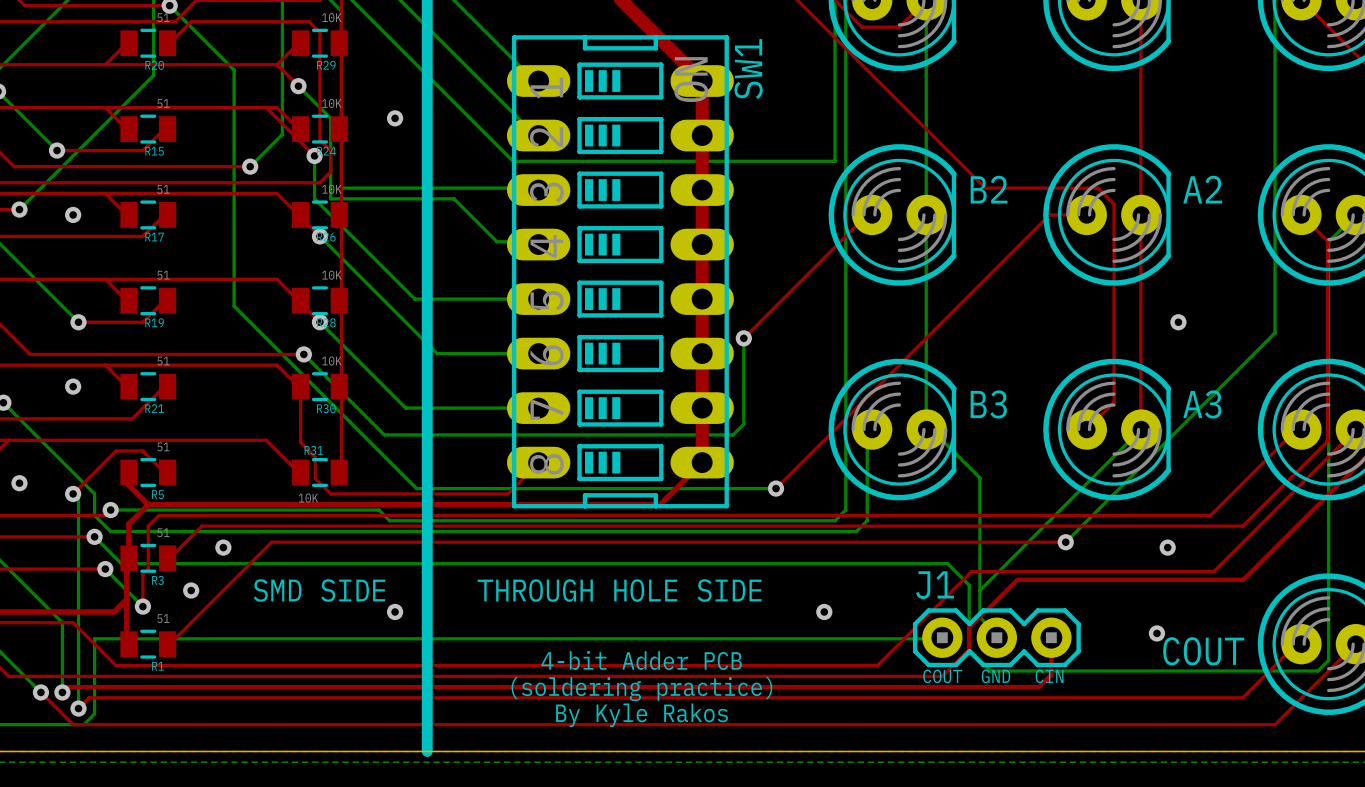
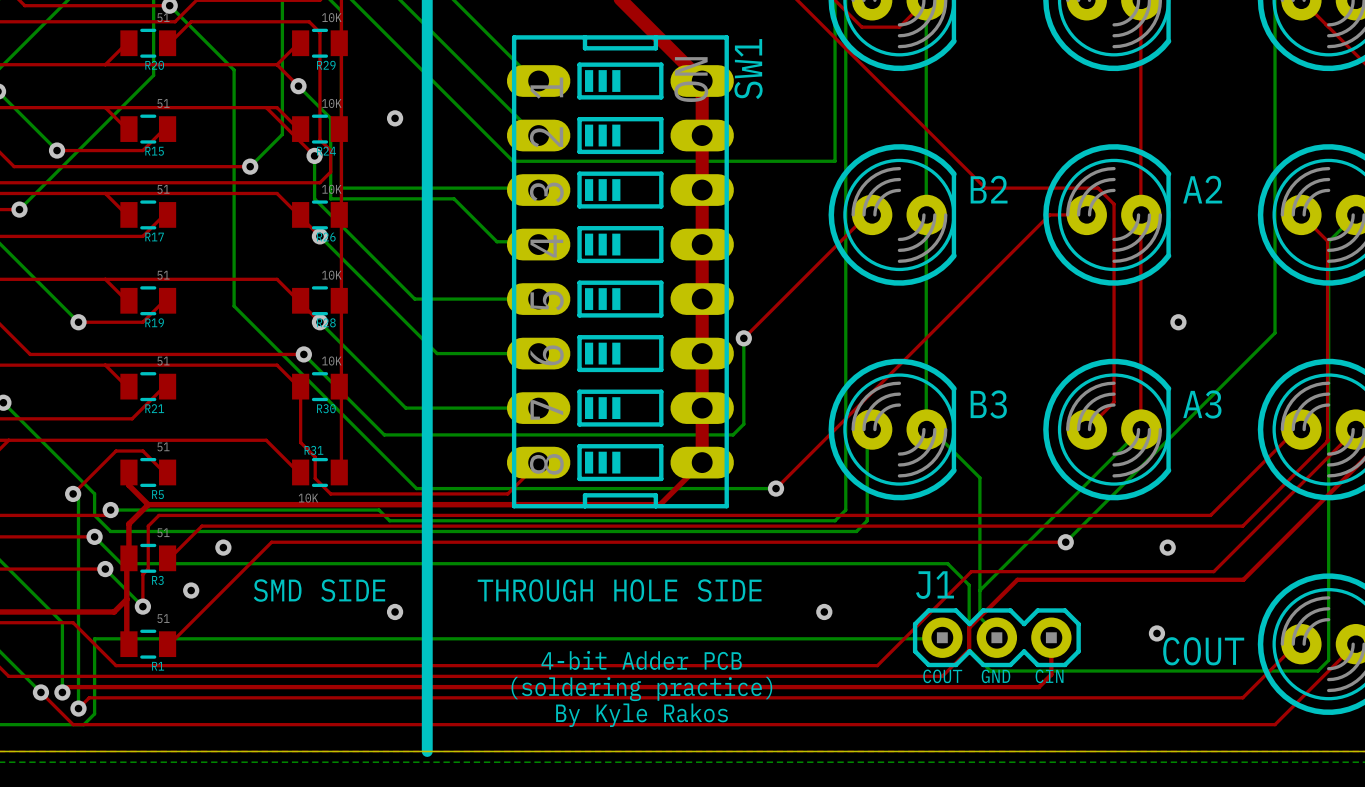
via: (73, 214) -> none
via: (73, 386) -> none
via: (19, 483) -> none

